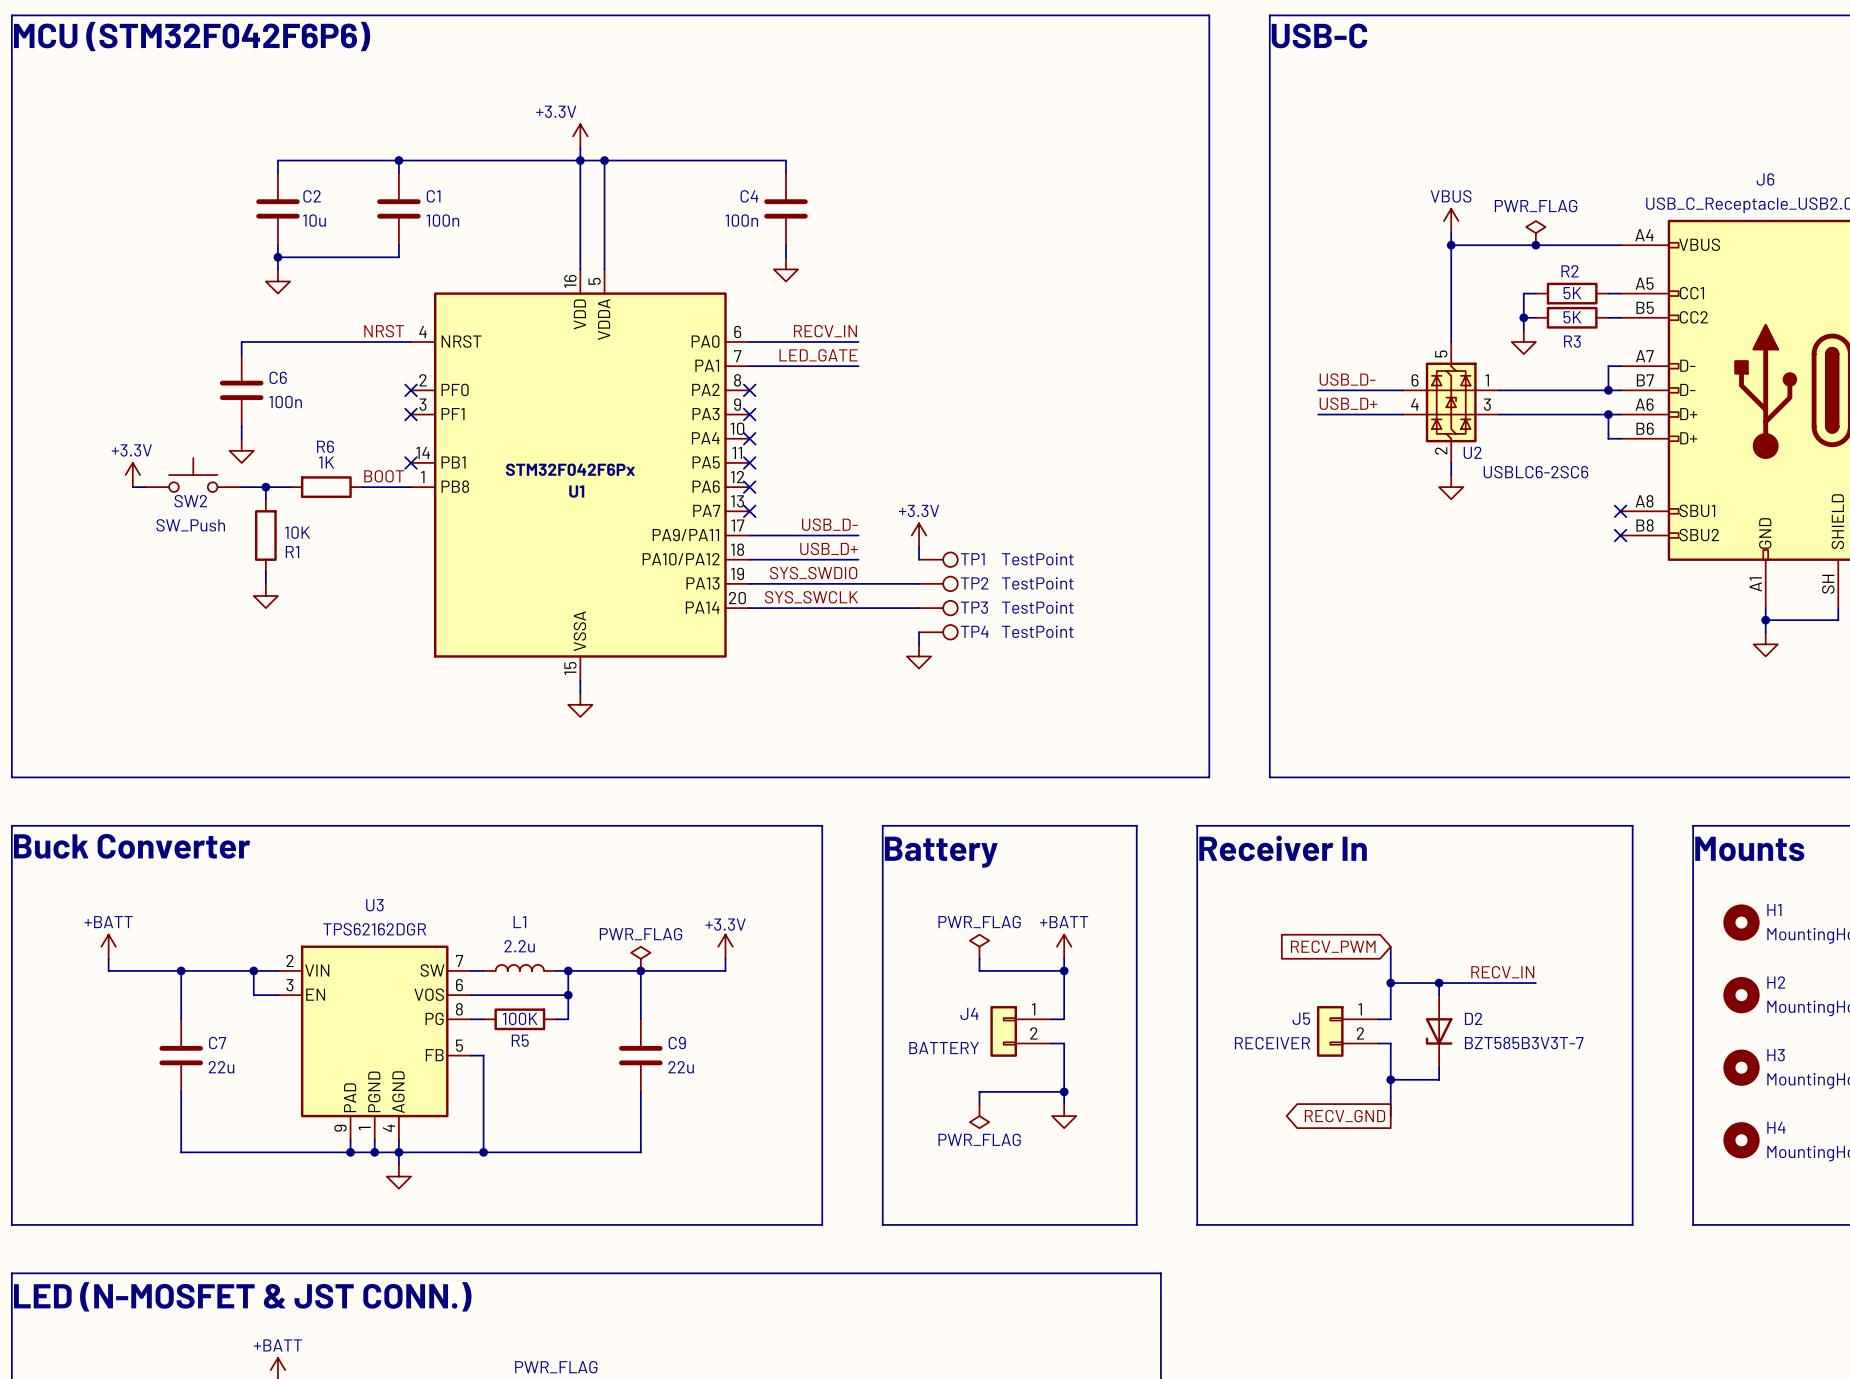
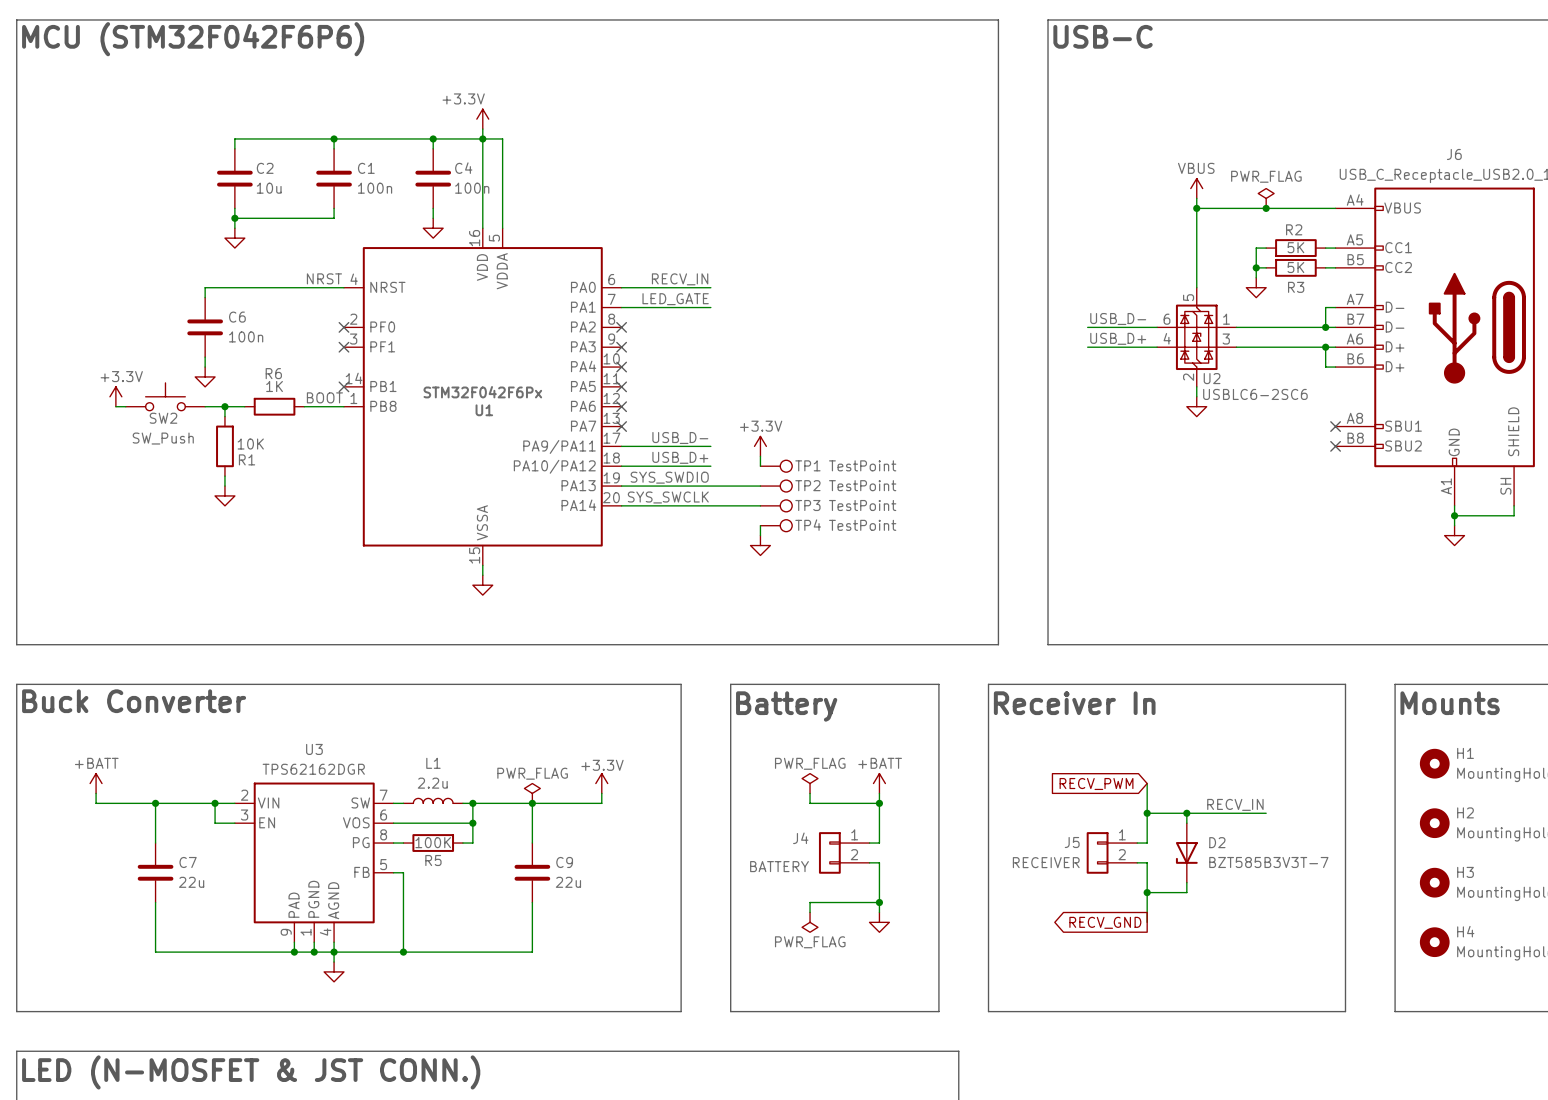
wire: none -> (433, 138) (433, 148)
junction: none -> (433, 138)
wire: (604, 160) (785, 160) (785, 172) -> none
junction: (604, 160) -> none
C4 name position: C4 (749, 196) -> C4 (463, 168)
C4 position: (785, 208) -> (433, 178)
C4 value position: 100n (741, 220) -> 100n (472, 188)
wire: none -> (433, 208) (433, 218)
wire: (785, 245) (785, 257) -> none
power symbol: none -> (433, 228)
power symbol: (785, 269) -> none

